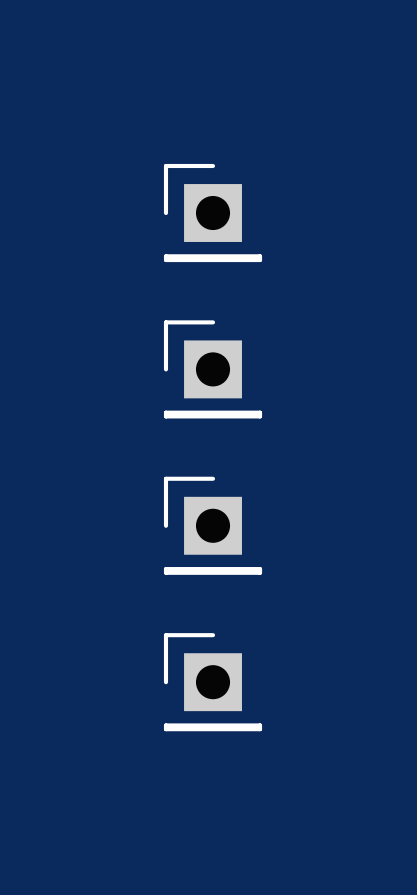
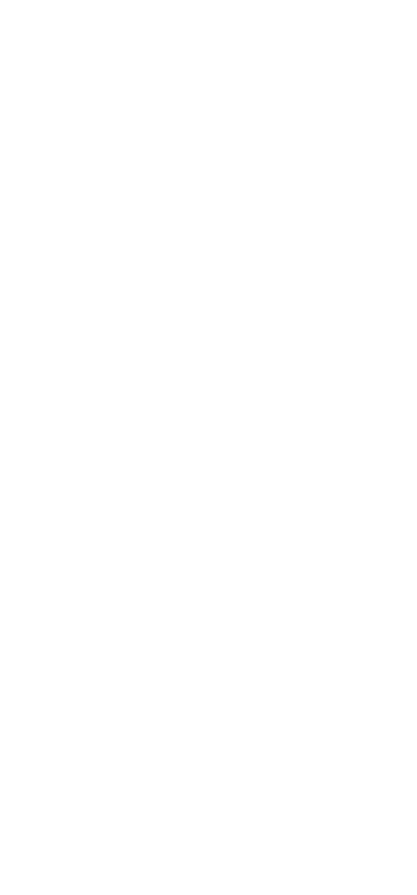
part: (213, 213) -> none
part: (213, 369) -> none
part: (213, 525) -> none
part: (213, 682) -> none

